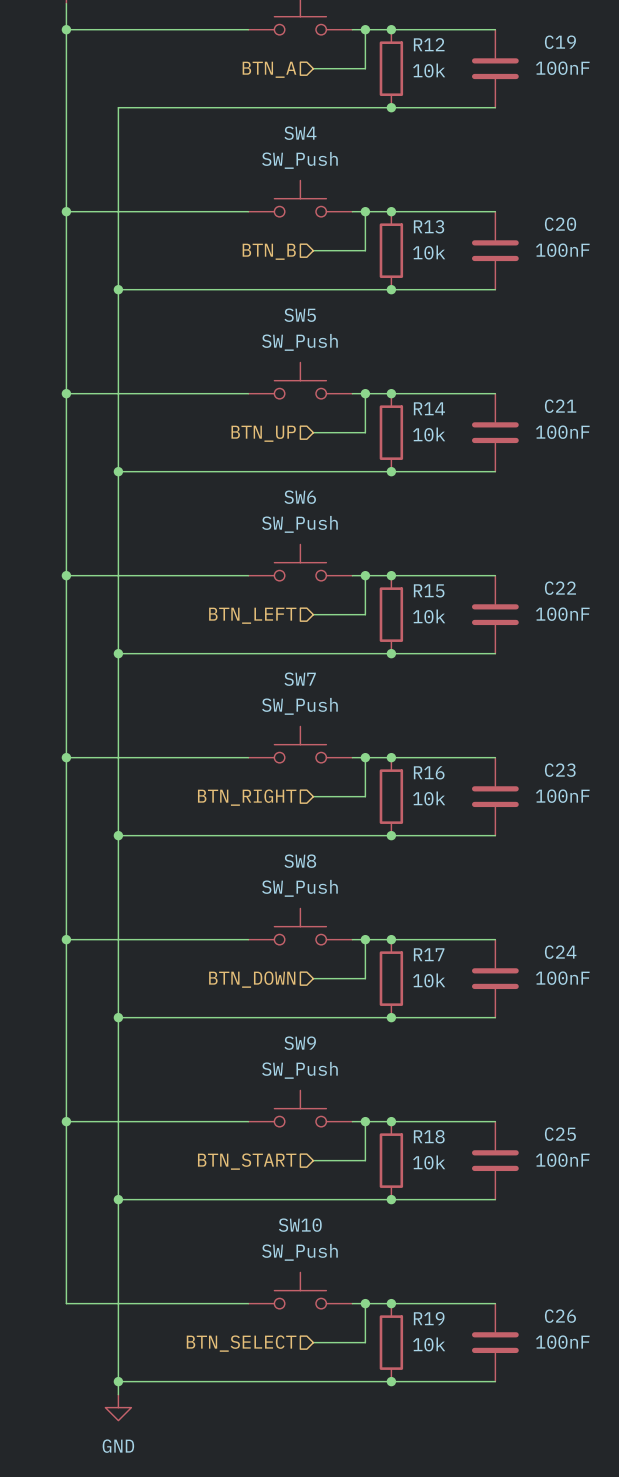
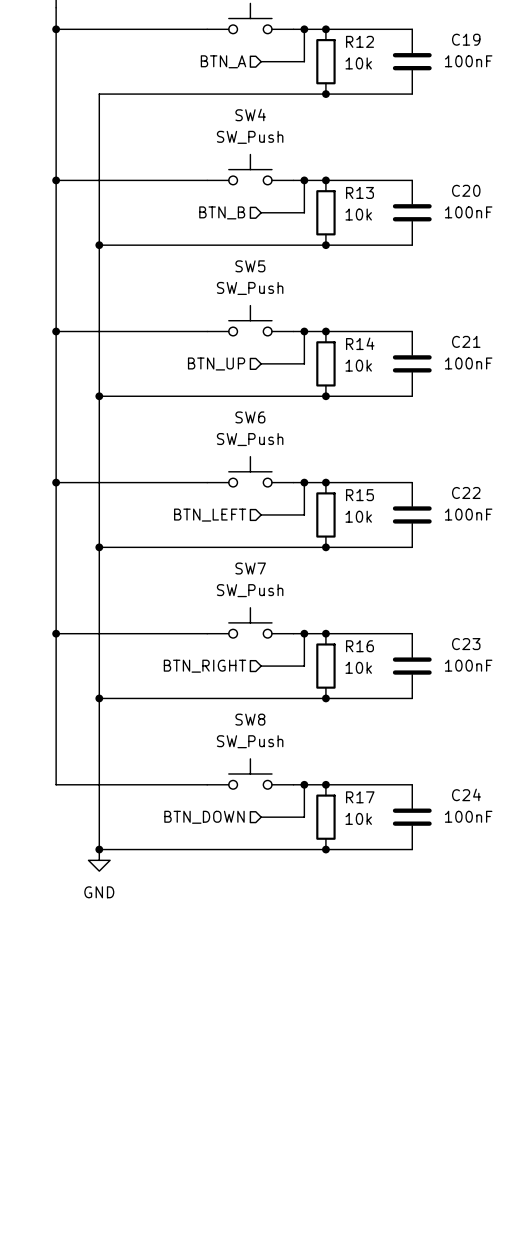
wire: (66, 939) (66, 1303) (248, 1303) -> none
junction: (66, 939) -> none
wire: (118, 1017) (118, 1394) -> none
power symbol: none -> GND (99, 860)
SW9: SW_Push (300, 1108) -> none
wire: (66, 1121) (248, 1121) -> none
junction: (66, 1121) -> none
wire: (352, 1121) (495, 1121) -> none
wire: (365, 1121) (365, 1160) (313, 1160) -> none
junction: (365, 1121) -> none
junction: (391, 1121) -> none
R18: 10k (391, 1160) -> none
C25: 100nF (495, 1160) -> none
hierarchical label: BTN_START (247, 1161) -> none
wire: (118, 1199) (495, 1199) -> none
junction: (118, 1199) -> none
junction: (391, 1199) -> none
SW10: SW_Push (300, 1290) -> none
wire: (352, 1303) (495, 1303) -> none
wire: (365, 1303) (365, 1342) (313, 1342) -> none
junction: (365, 1303) -> none
junction: (391, 1303) -> none
R19: 10k (391, 1342) -> none
C26: 100nF (495, 1342) -> none
hierarchical label: BTN_SELECT (241, 1343) -> none
wire: (118, 1381) (495, 1381) -> none
junction: (118, 1381) -> none
junction: (391, 1381) -> none
power symbol: GND (118, 1407) -> none

